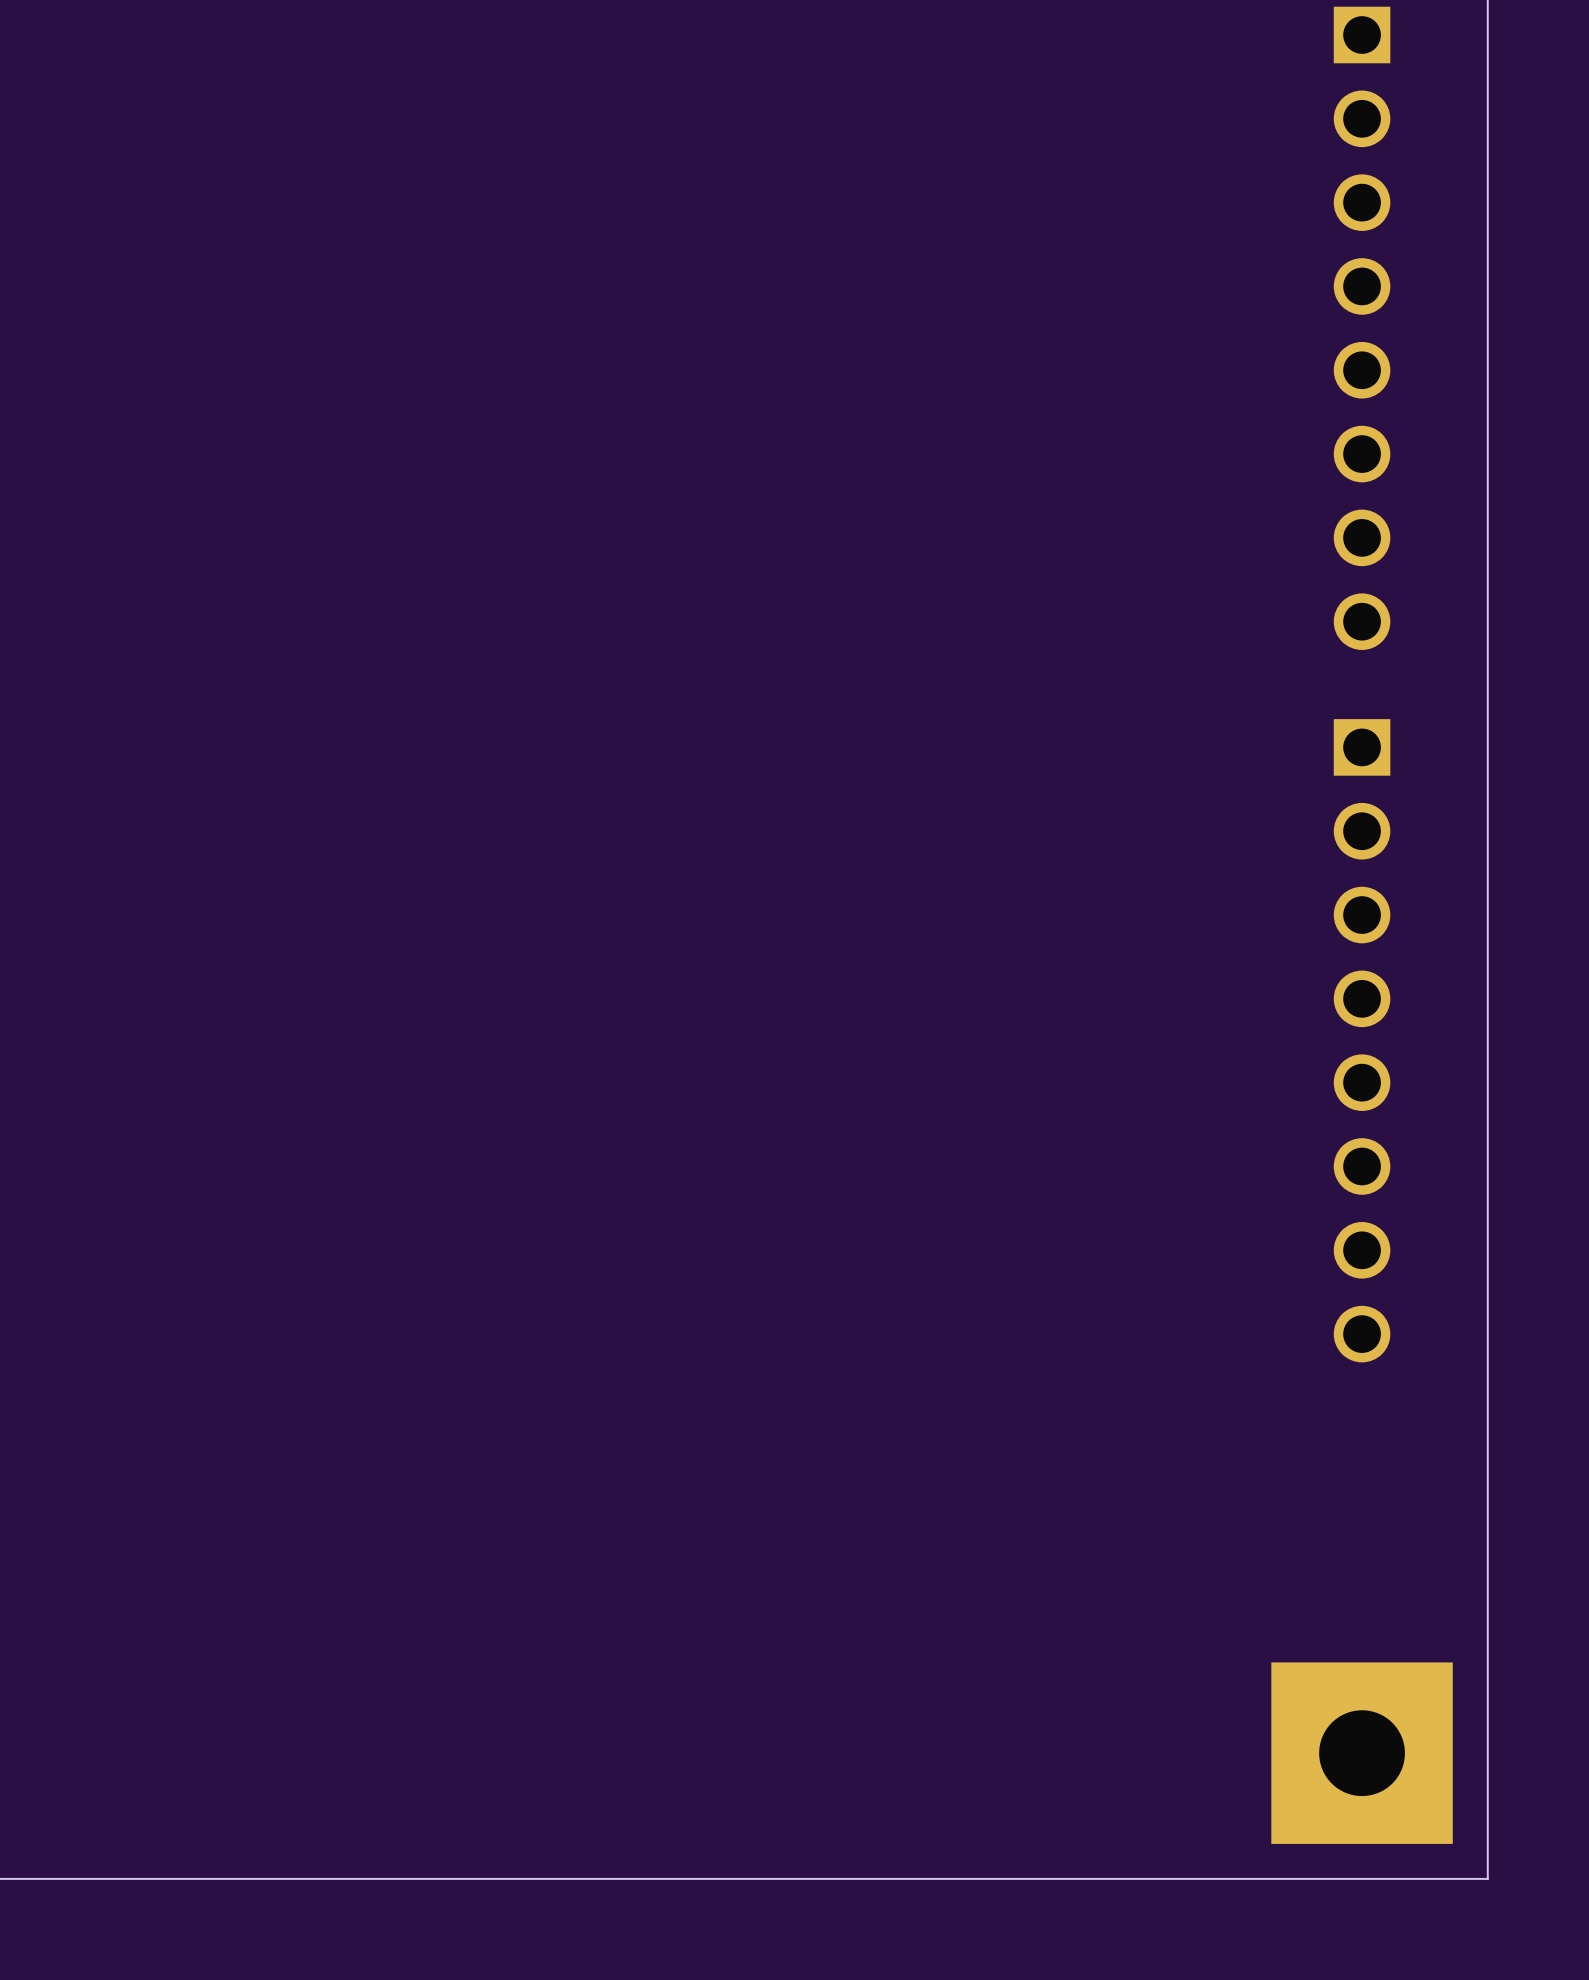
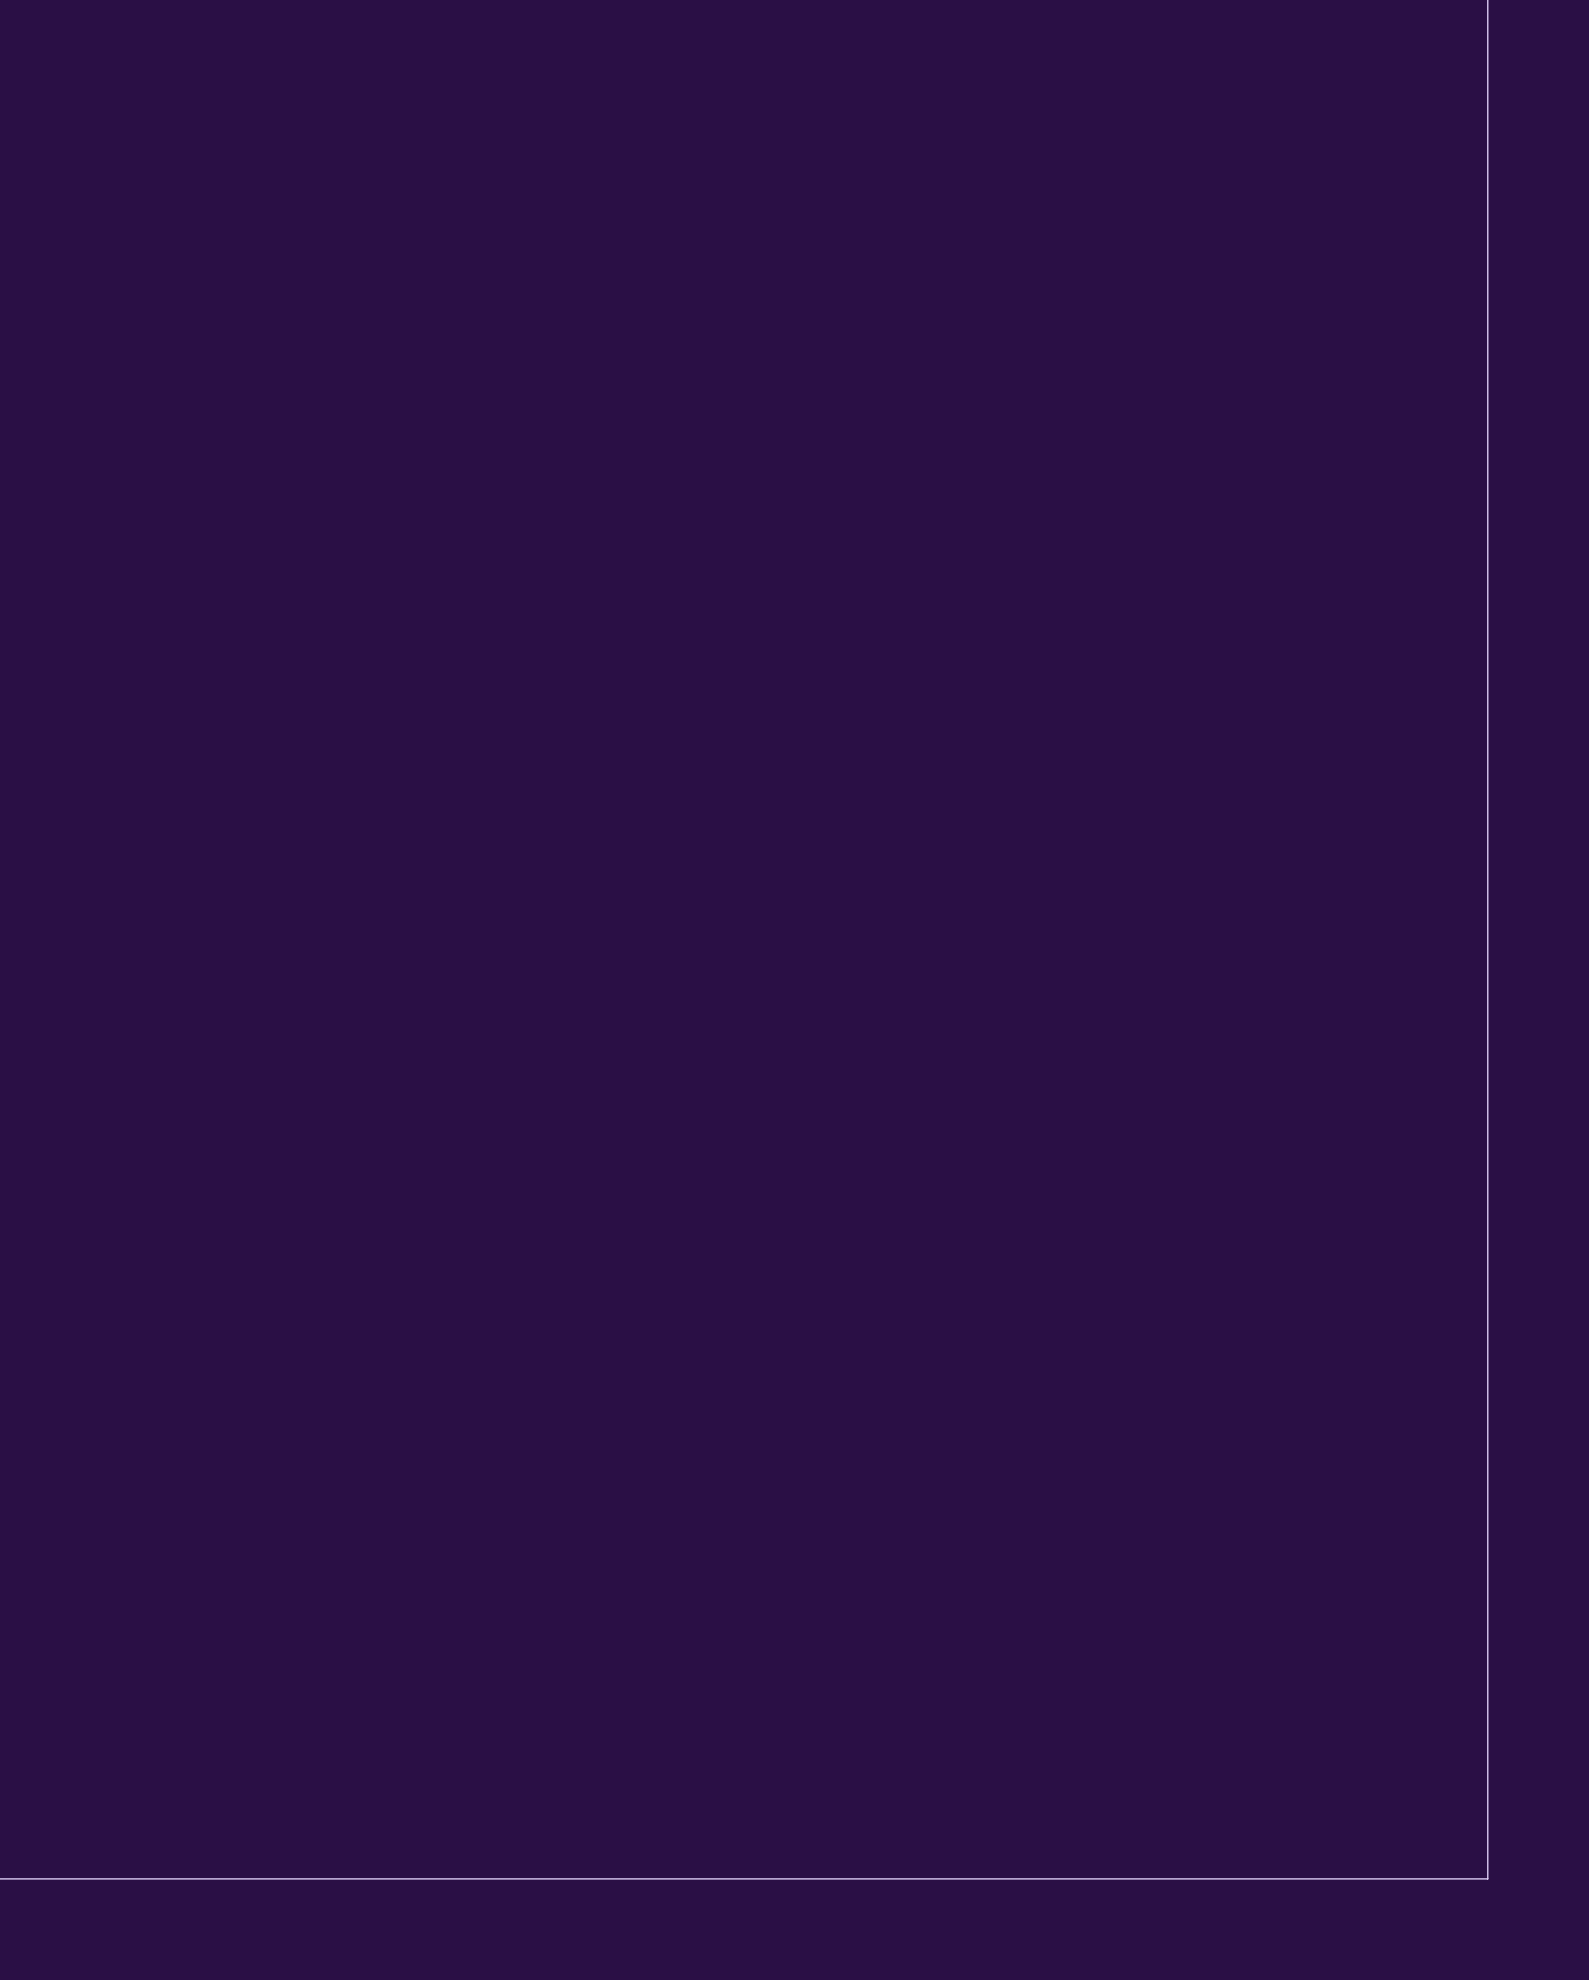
part: (1362, 328) -> none
part: (1362, 1040) -> none
part: (1362, 1753) -> none

